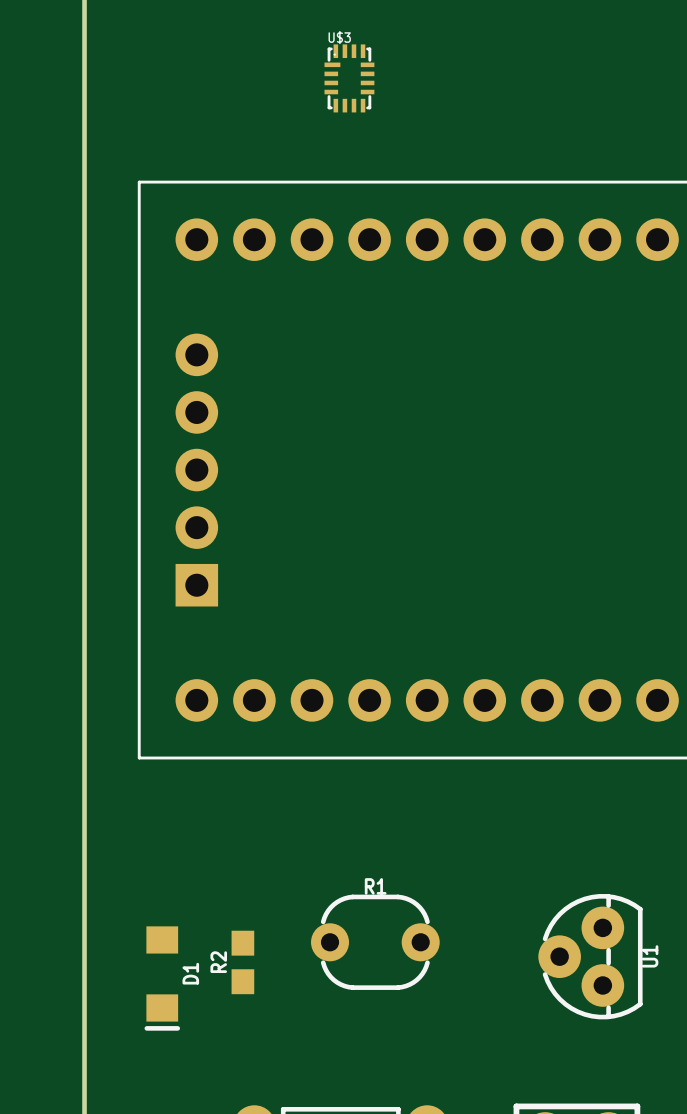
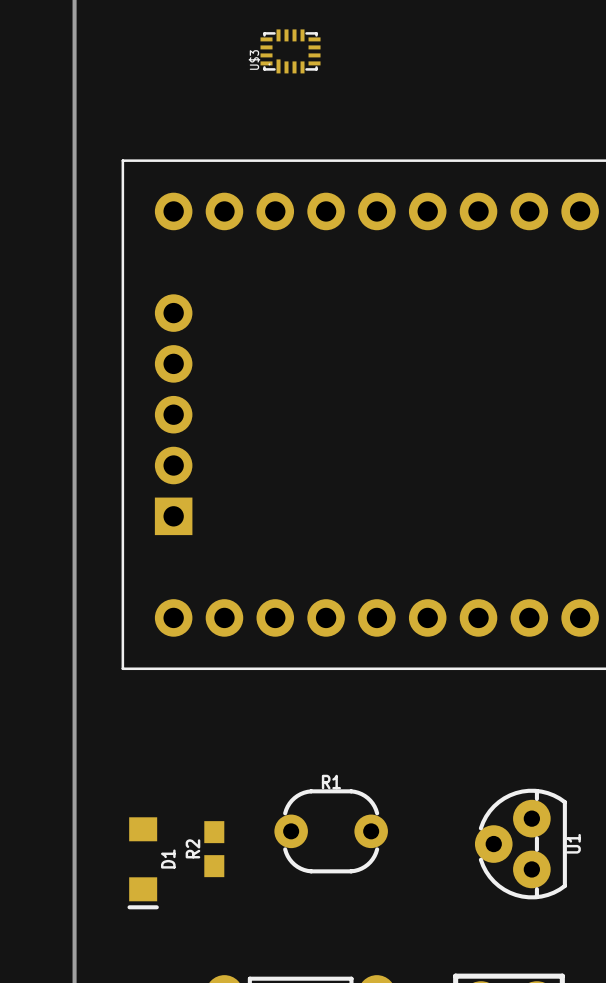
U$3 rotation: 0° (349, 78) -> 90° counterclockwise (290, 51)

